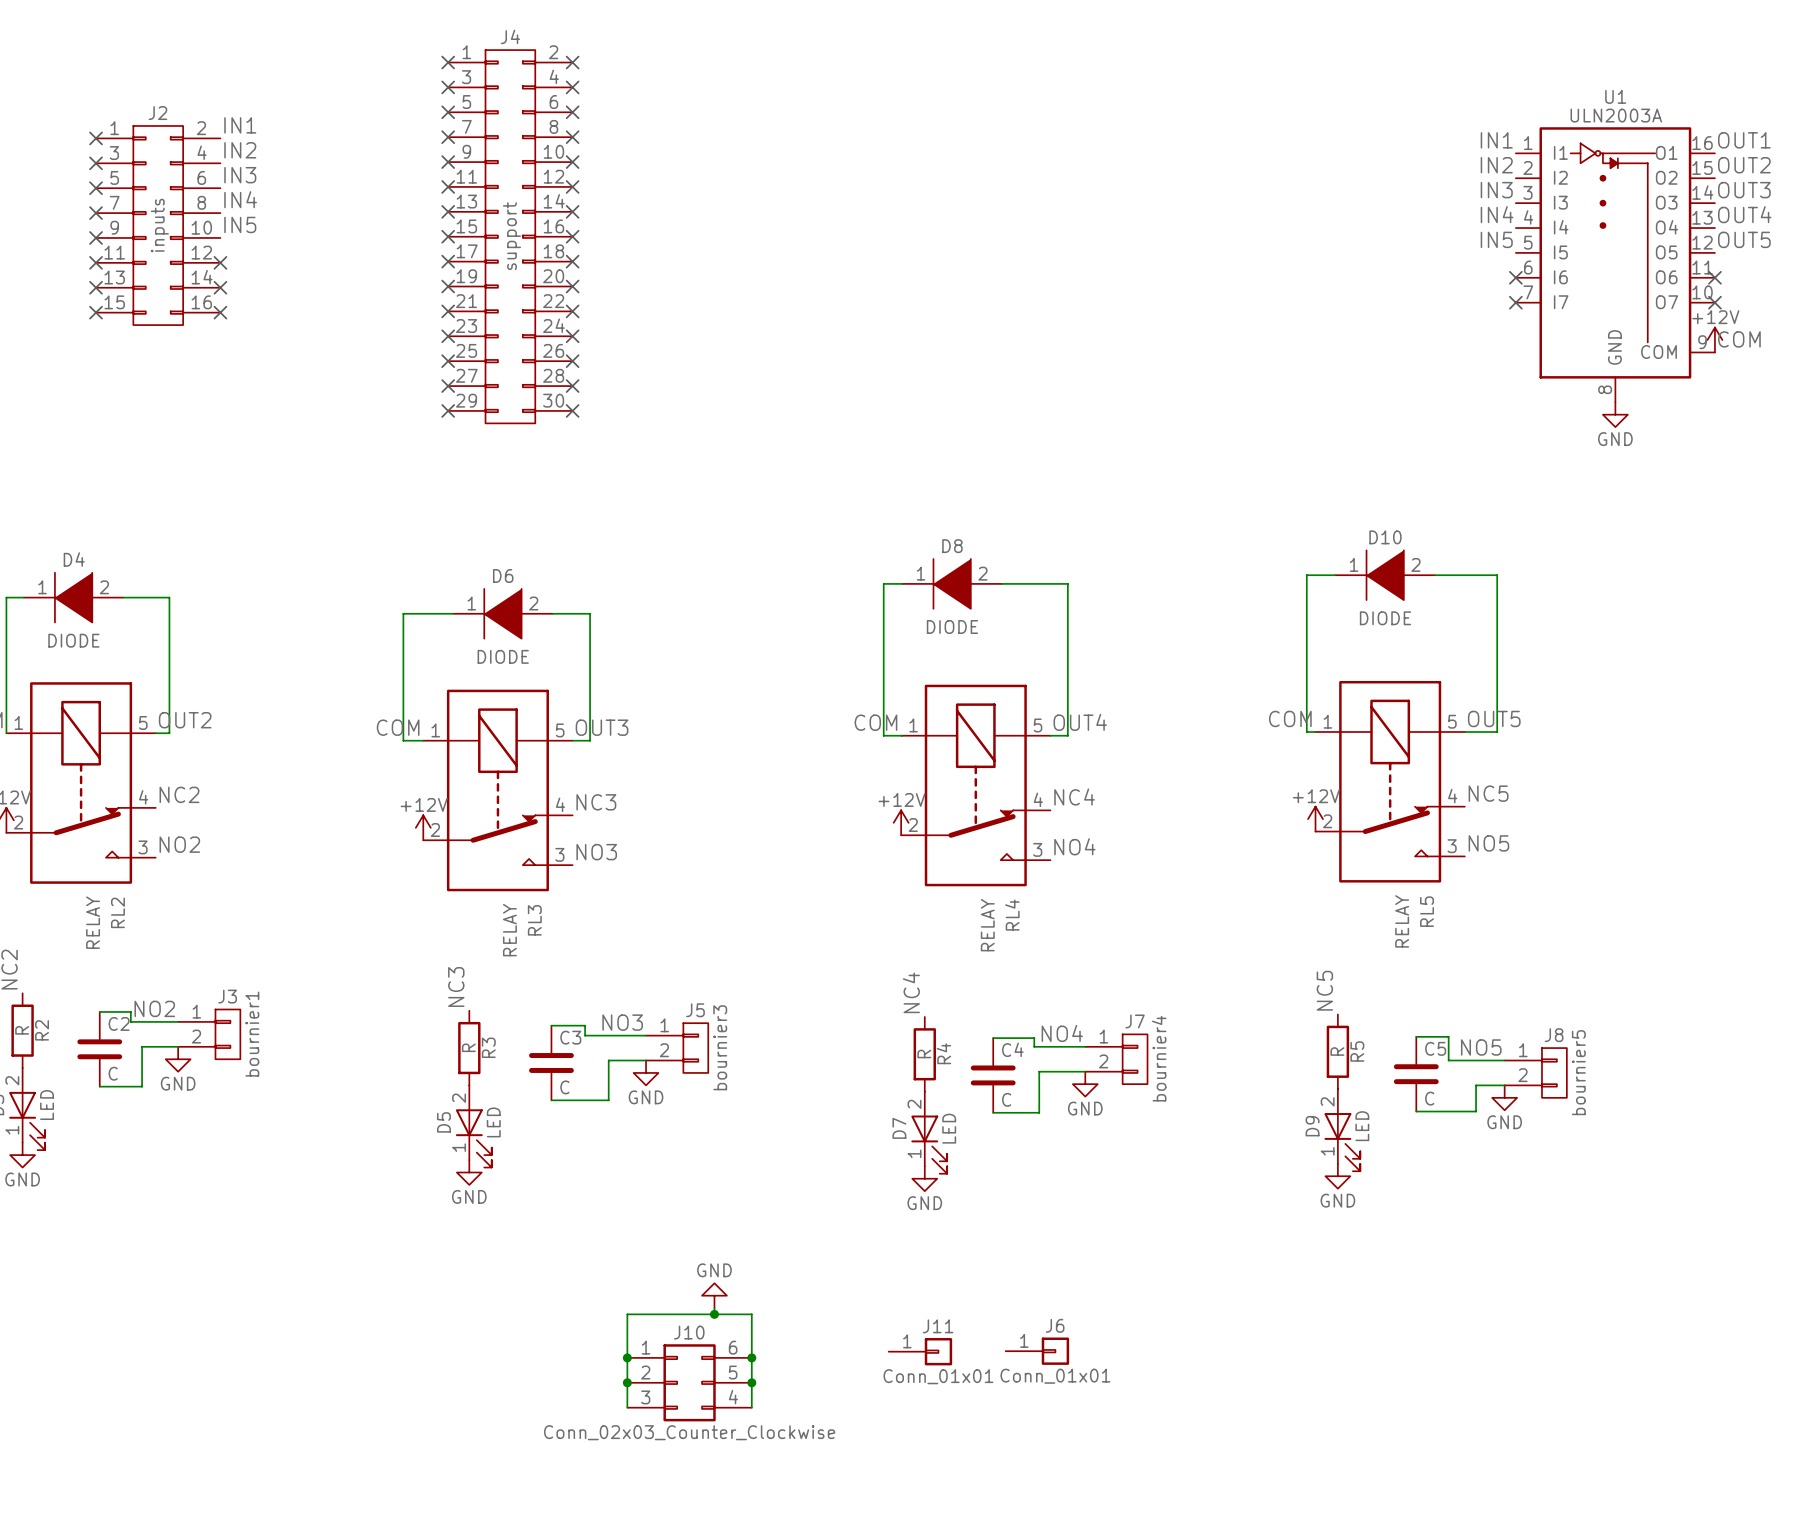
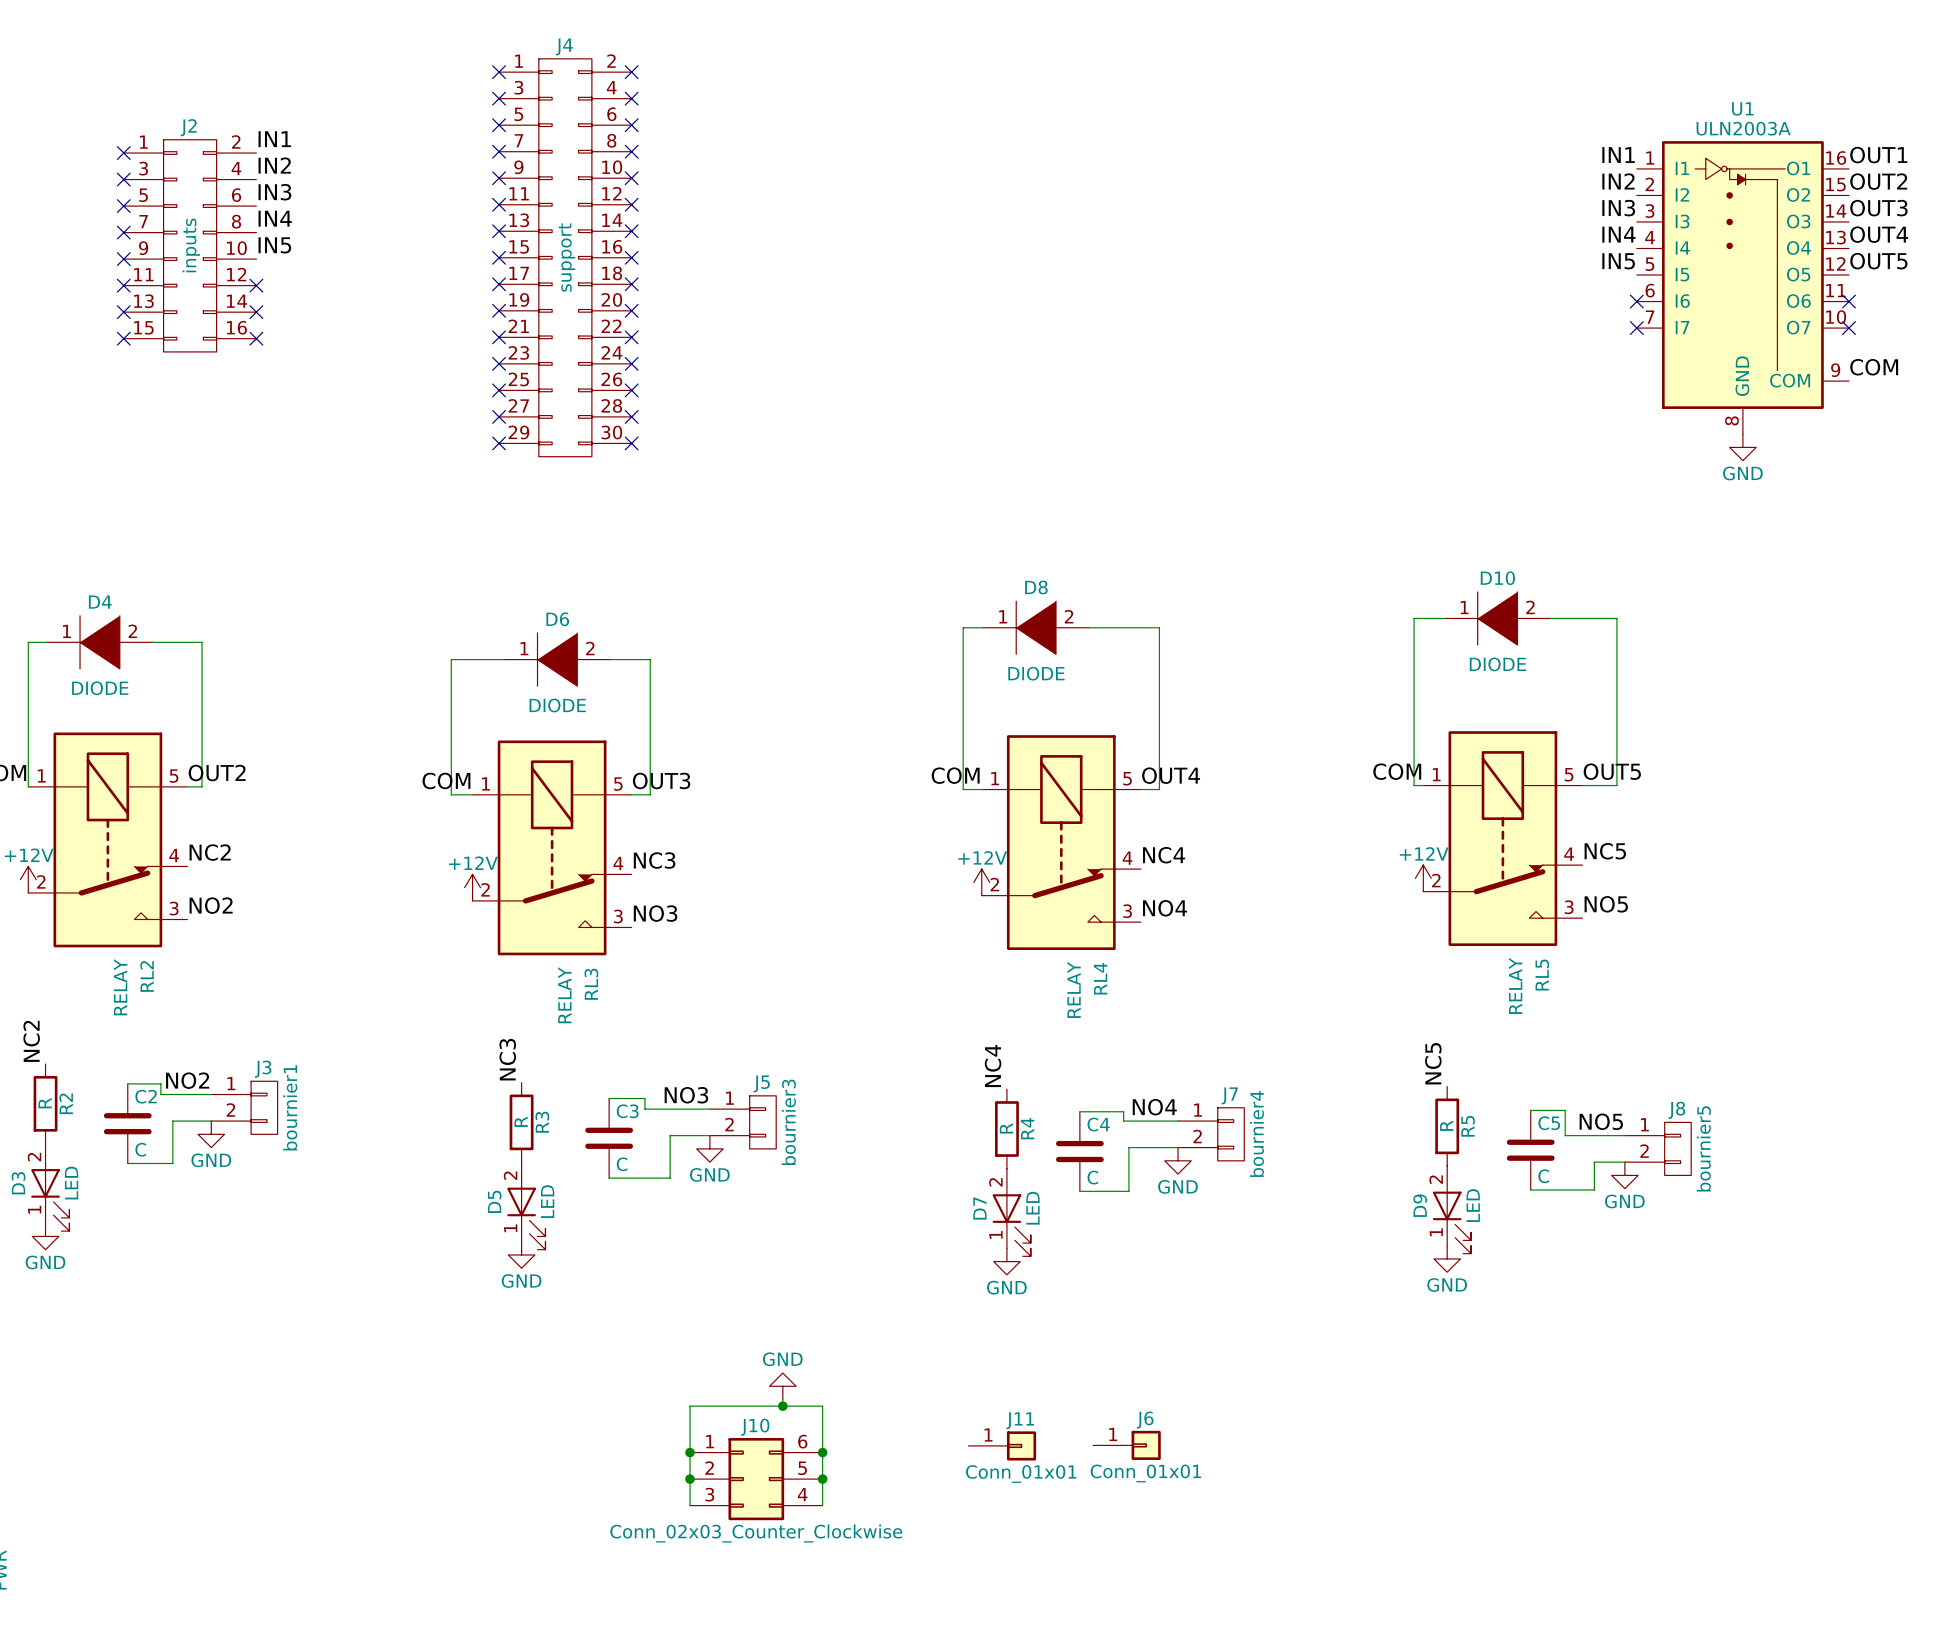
power symbol: +12V (1714, 340) -> none

